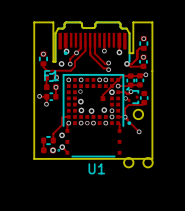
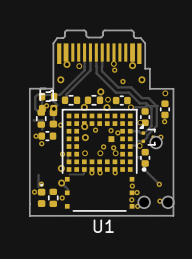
part footprint: [53, 21, 134, 63] -> [52, 29, 151, 90]
board edge: (53, 22) (34, 22) (34, 158) (152, 158) -> (53, 88) (29, 88) (29, 215) (173, 215) (173, 197)
board edge: (133, 22) (152, 22) (152, 71) -> (149, 88) (173, 88)
via: (143, 38) -> none
part: (143, 43) -> none
track: (80, 48) (70, 59) (70, 64) -> (84, 60) (84, 70) (60, 94) (37, 94) (35, 96) (35, 108) (41, 112)
track: (143, 48) (137, 50) (137, 58) (131, 63) (127, 63) -> none
track: (85, 50) (74, 61) (74, 66) (70, 70) (47, 70) (43, 67) (43, 63) -> (90, 63) (90, 70) (66, 94) (65, 100)
track: (94, 53) (105, 64) (108, 63) -> (101, 66) (101, 71) (118, 87) (131, 87) (141, 98) (148, 98) (156, 106) (156, 125) (143, 141) (138, 140)
via: (43, 54) -> none
track: (90, 55) (103, 68) (108, 69) -> (96, 69) (96, 73) (115, 92) (129, 92) (139, 103) (146, 103) (151, 108) (151, 126) (144, 133) (130, 131)
via: none -> (114, 70)
via: (143, 57) -> none
part: (43, 58) -> none
part: (143, 61) -> none
via: (108, 63) -> none
track: (127, 63) (130, 66) (143, 66) -> none
via: (70, 64) -> none
via: none -> (122, 81)
via: (108, 69) -> none
via: none -> (100, 91)
track: (145, 74) (122, 76) (102, 95) (102, 98) (101, 97) -> none
via: (56, 77) -> none
via: (68, 79) -> none
via: (81, 79) -> none
via: (105, 79) -> none
track: none -> (53, 100) (57, 105)
part: none -> (71, 100)
part: none -> (93, 100)
part: none -> (121, 100)
part: (130, 80) -> none
part: (139, 80) -> none
via: none -> (46, 105)
via: none -> (84, 107)
via: none -> (106, 107)
part footprint: [125, 86, 139, 104] -> [140, 108, 151, 127]
part: none -> (164, 109)
via: (80, 91) -> none
track: (131, 91) (128, 93) (118, 92) -> none
via: (131, 91) -> none
via: (111, 92) -> none
part: none -> (53, 118)
part: none -> (41, 118)
via: (39, 96) -> none
part position: (51, 96) -> (47, 136)
via: none -> (164, 121)
part: (144, 98) -> none
via: none -> (60, 125)
track: (144, 102) (141, 104) (128, 104) (125, 108) (125, 117) (139, 131) -> none
via: (46, 104) -> none
via: none -> (95, 130)
via: none -> (111, 130)
via: none -> (117, 132)
part: none -> (147, 134)
via: none -> (36, 136)
via: (104, 110) -> none
via: (111, 110) -> none
via: none -> (160, 137)
via: (91, 111) -> none
via: none -> (41, 143)
U1 position: (97, 115) -> (104, 160)
track: (68, 116) (62, 118) (62, 125) (53, 133) (53, 140) -> none
via: (111, 116) -> none
via: none -> (103, 146)
via: none -> (113, 147)
via: none -> (62, 154)
via: (68, 123) -> none
via: (87, 123) -> none
track: (118, 123) (119, 130) -> none
track: none -> (138, 157) (145, 163) (145, 170) (159, 184)
part: none -> (145, 157)
via: (139, 131) -> none
track: none -> (84, 169) (83, 174) (69, 174)
via: none -> (91, 172)
via: none -> (100, 172)
via: none -> (115, 172)
part rotation: 0° (48, 140) -> 90° clockwise (53, 197)
part position: (48, 140) -> (53, 197)
via: none -> (41, 184)
via: none -> (159, 184)
via: none -> (132, 186)
part rotation: 0° (50, 150) -> 90° counterclockwise (41, 195)
via: (53, 150) -> none
via: none -> (34, 192)
via: none -> (137, 192)
via: none -> (62, 197)
via: none -> (131, 199)
via: none -> (159, 201)
via: none -> (137, 206)

